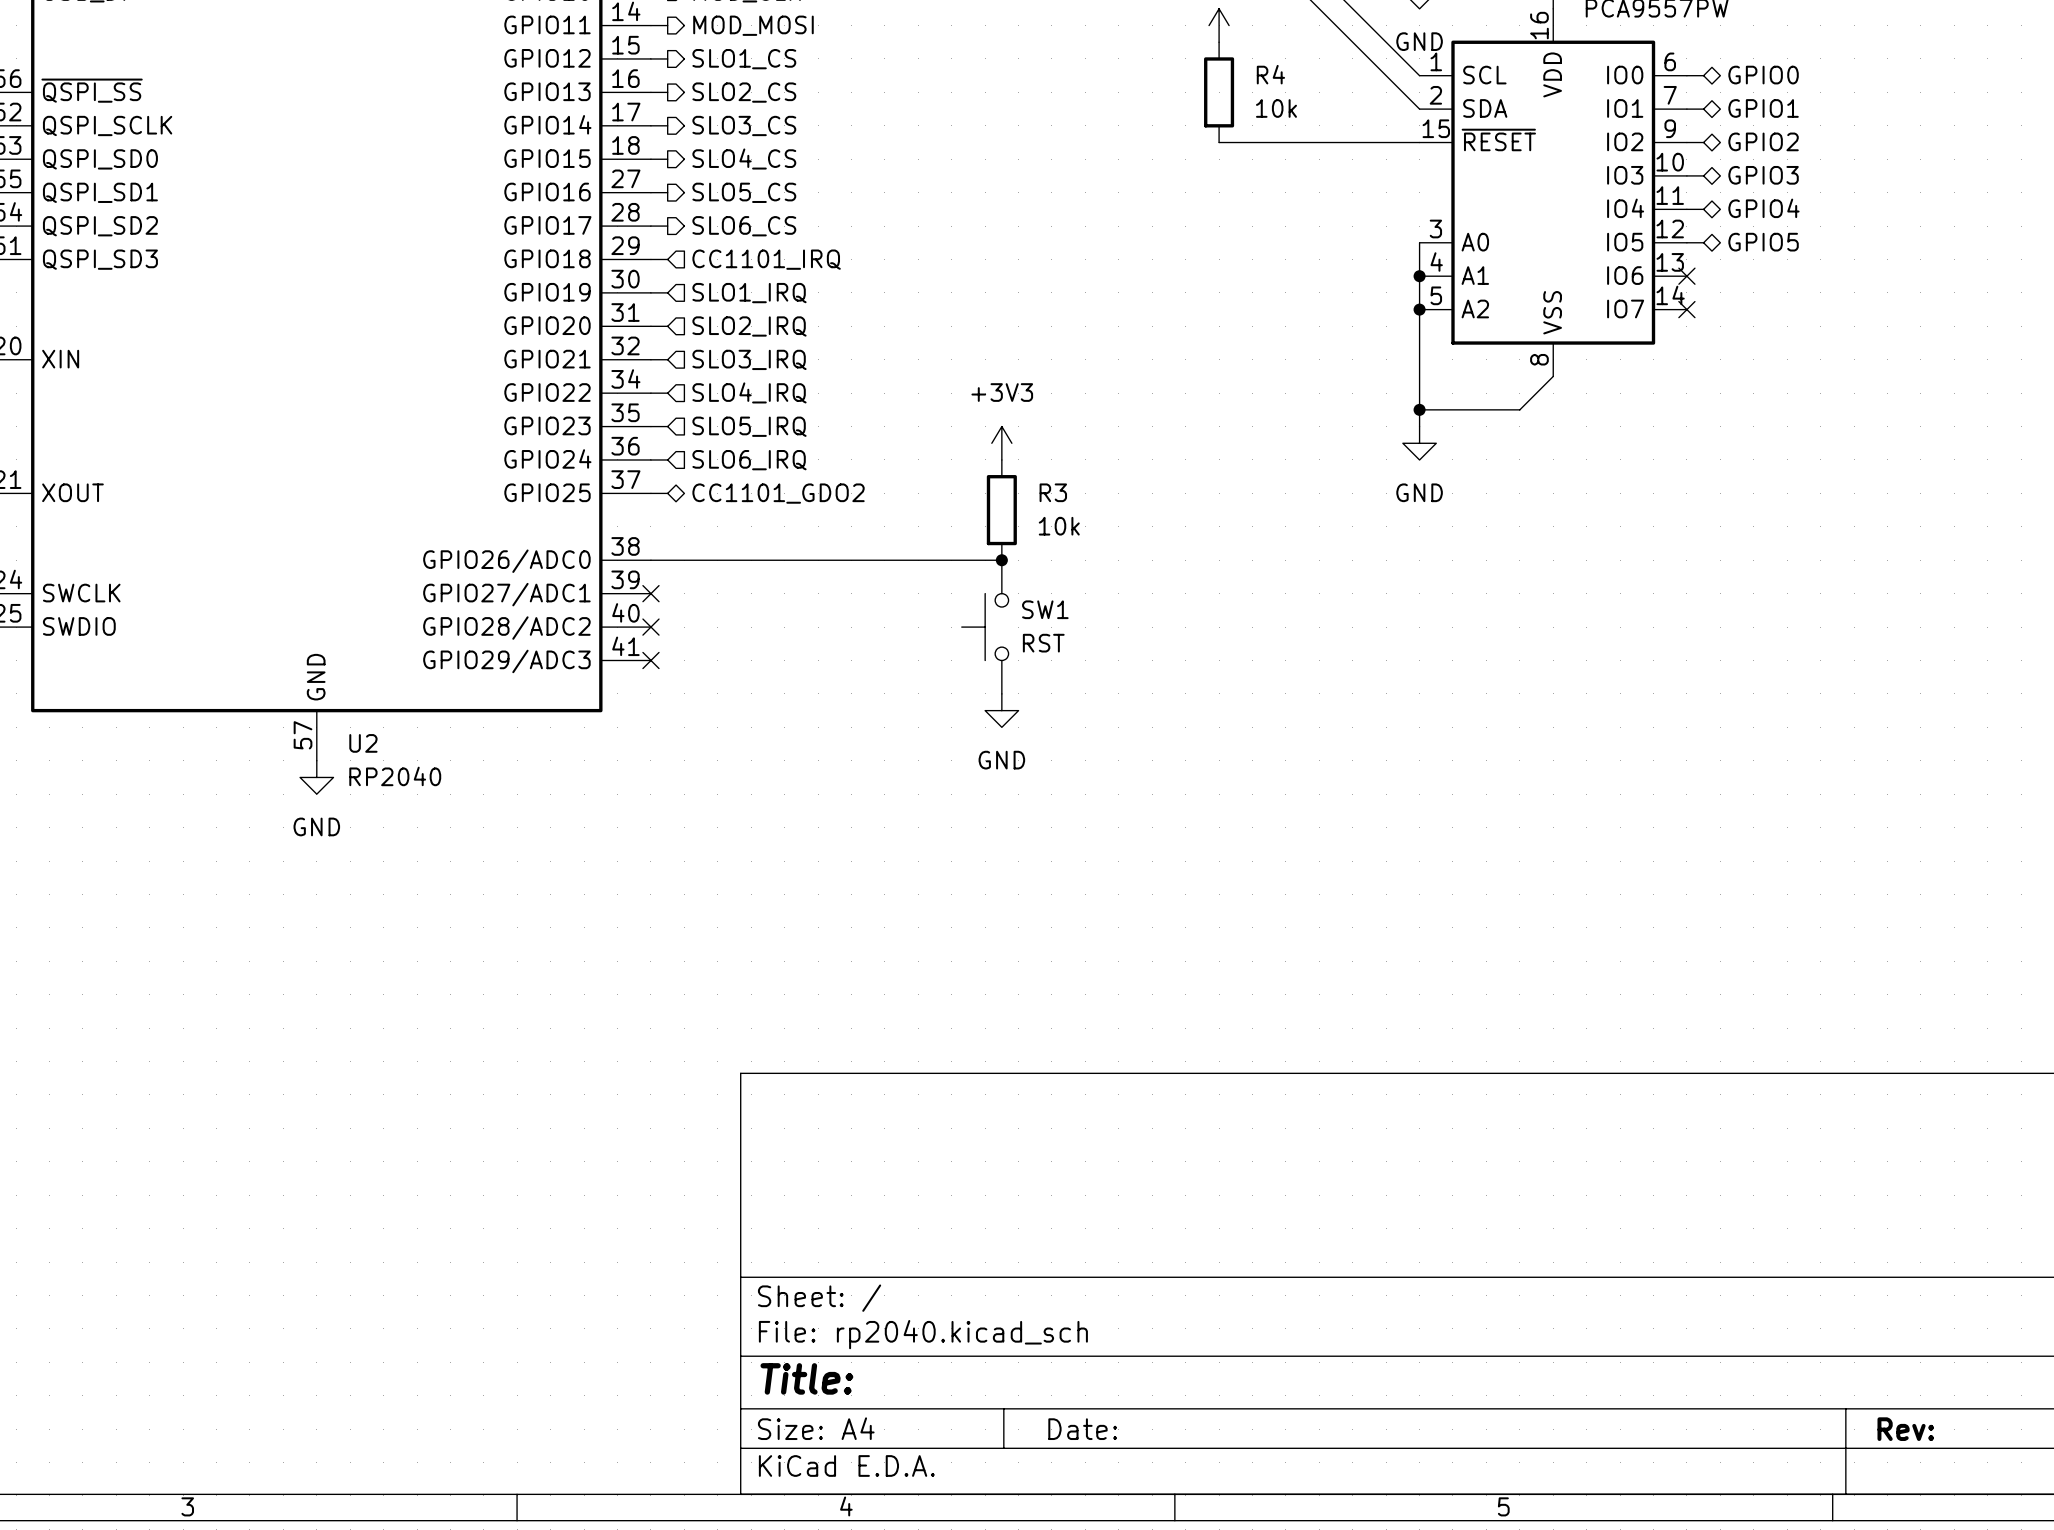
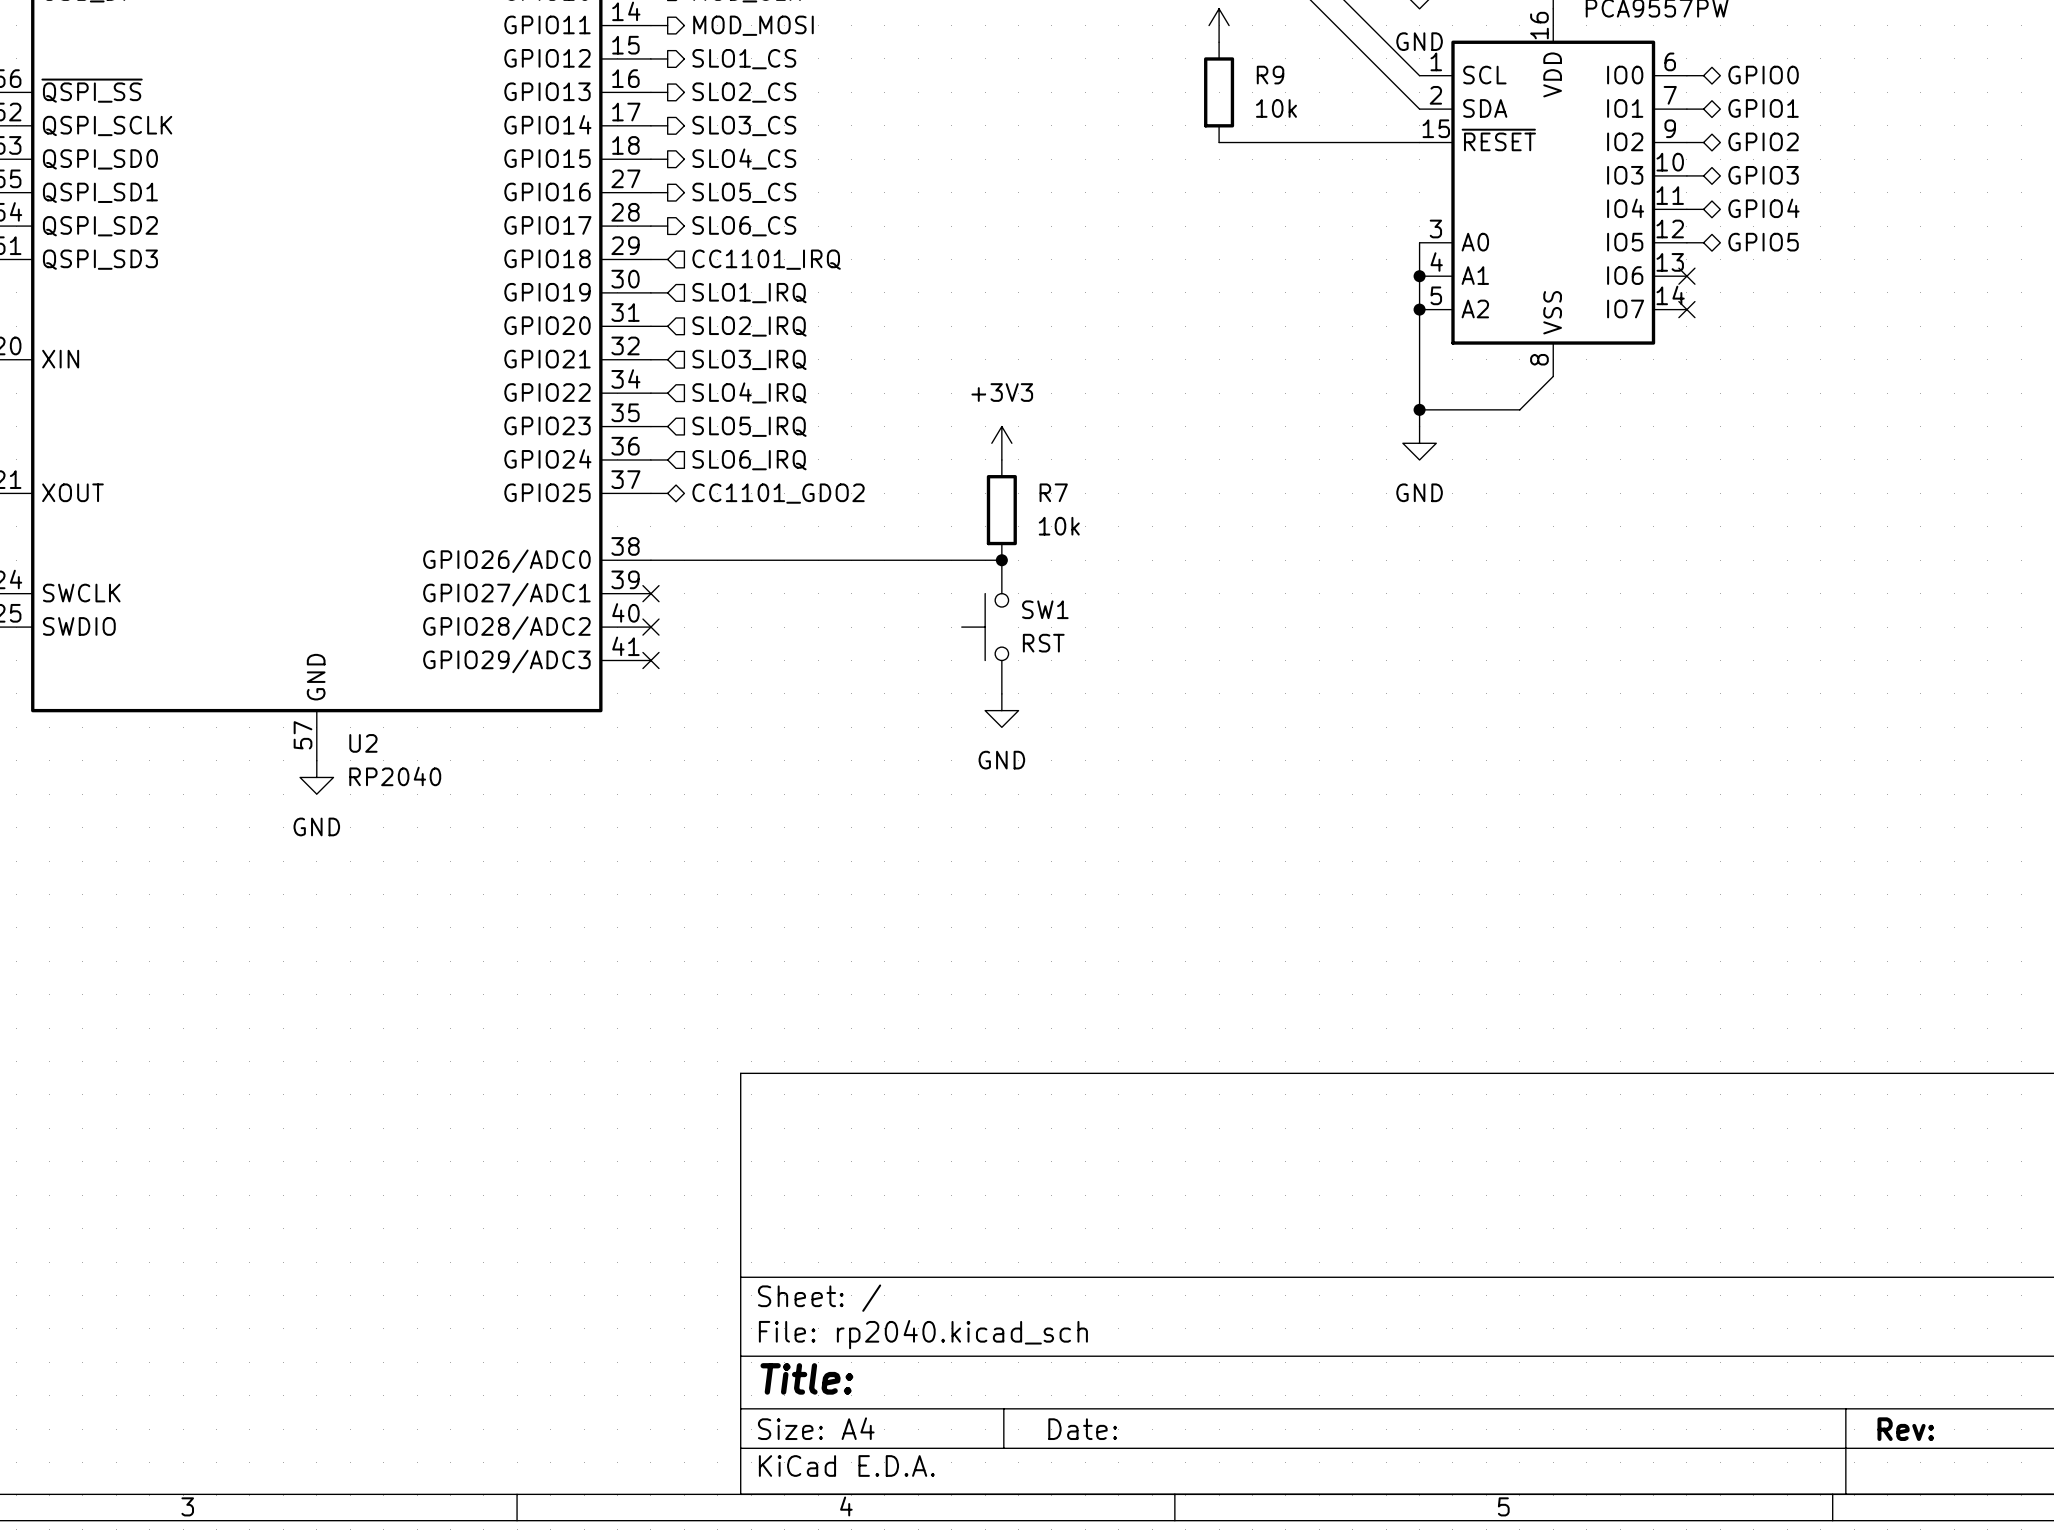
R4 name: R4 (1270, 74) -> R9 (1270, 75)
R3 name: R3 (1053, 492) -> R7 (1053, 492)

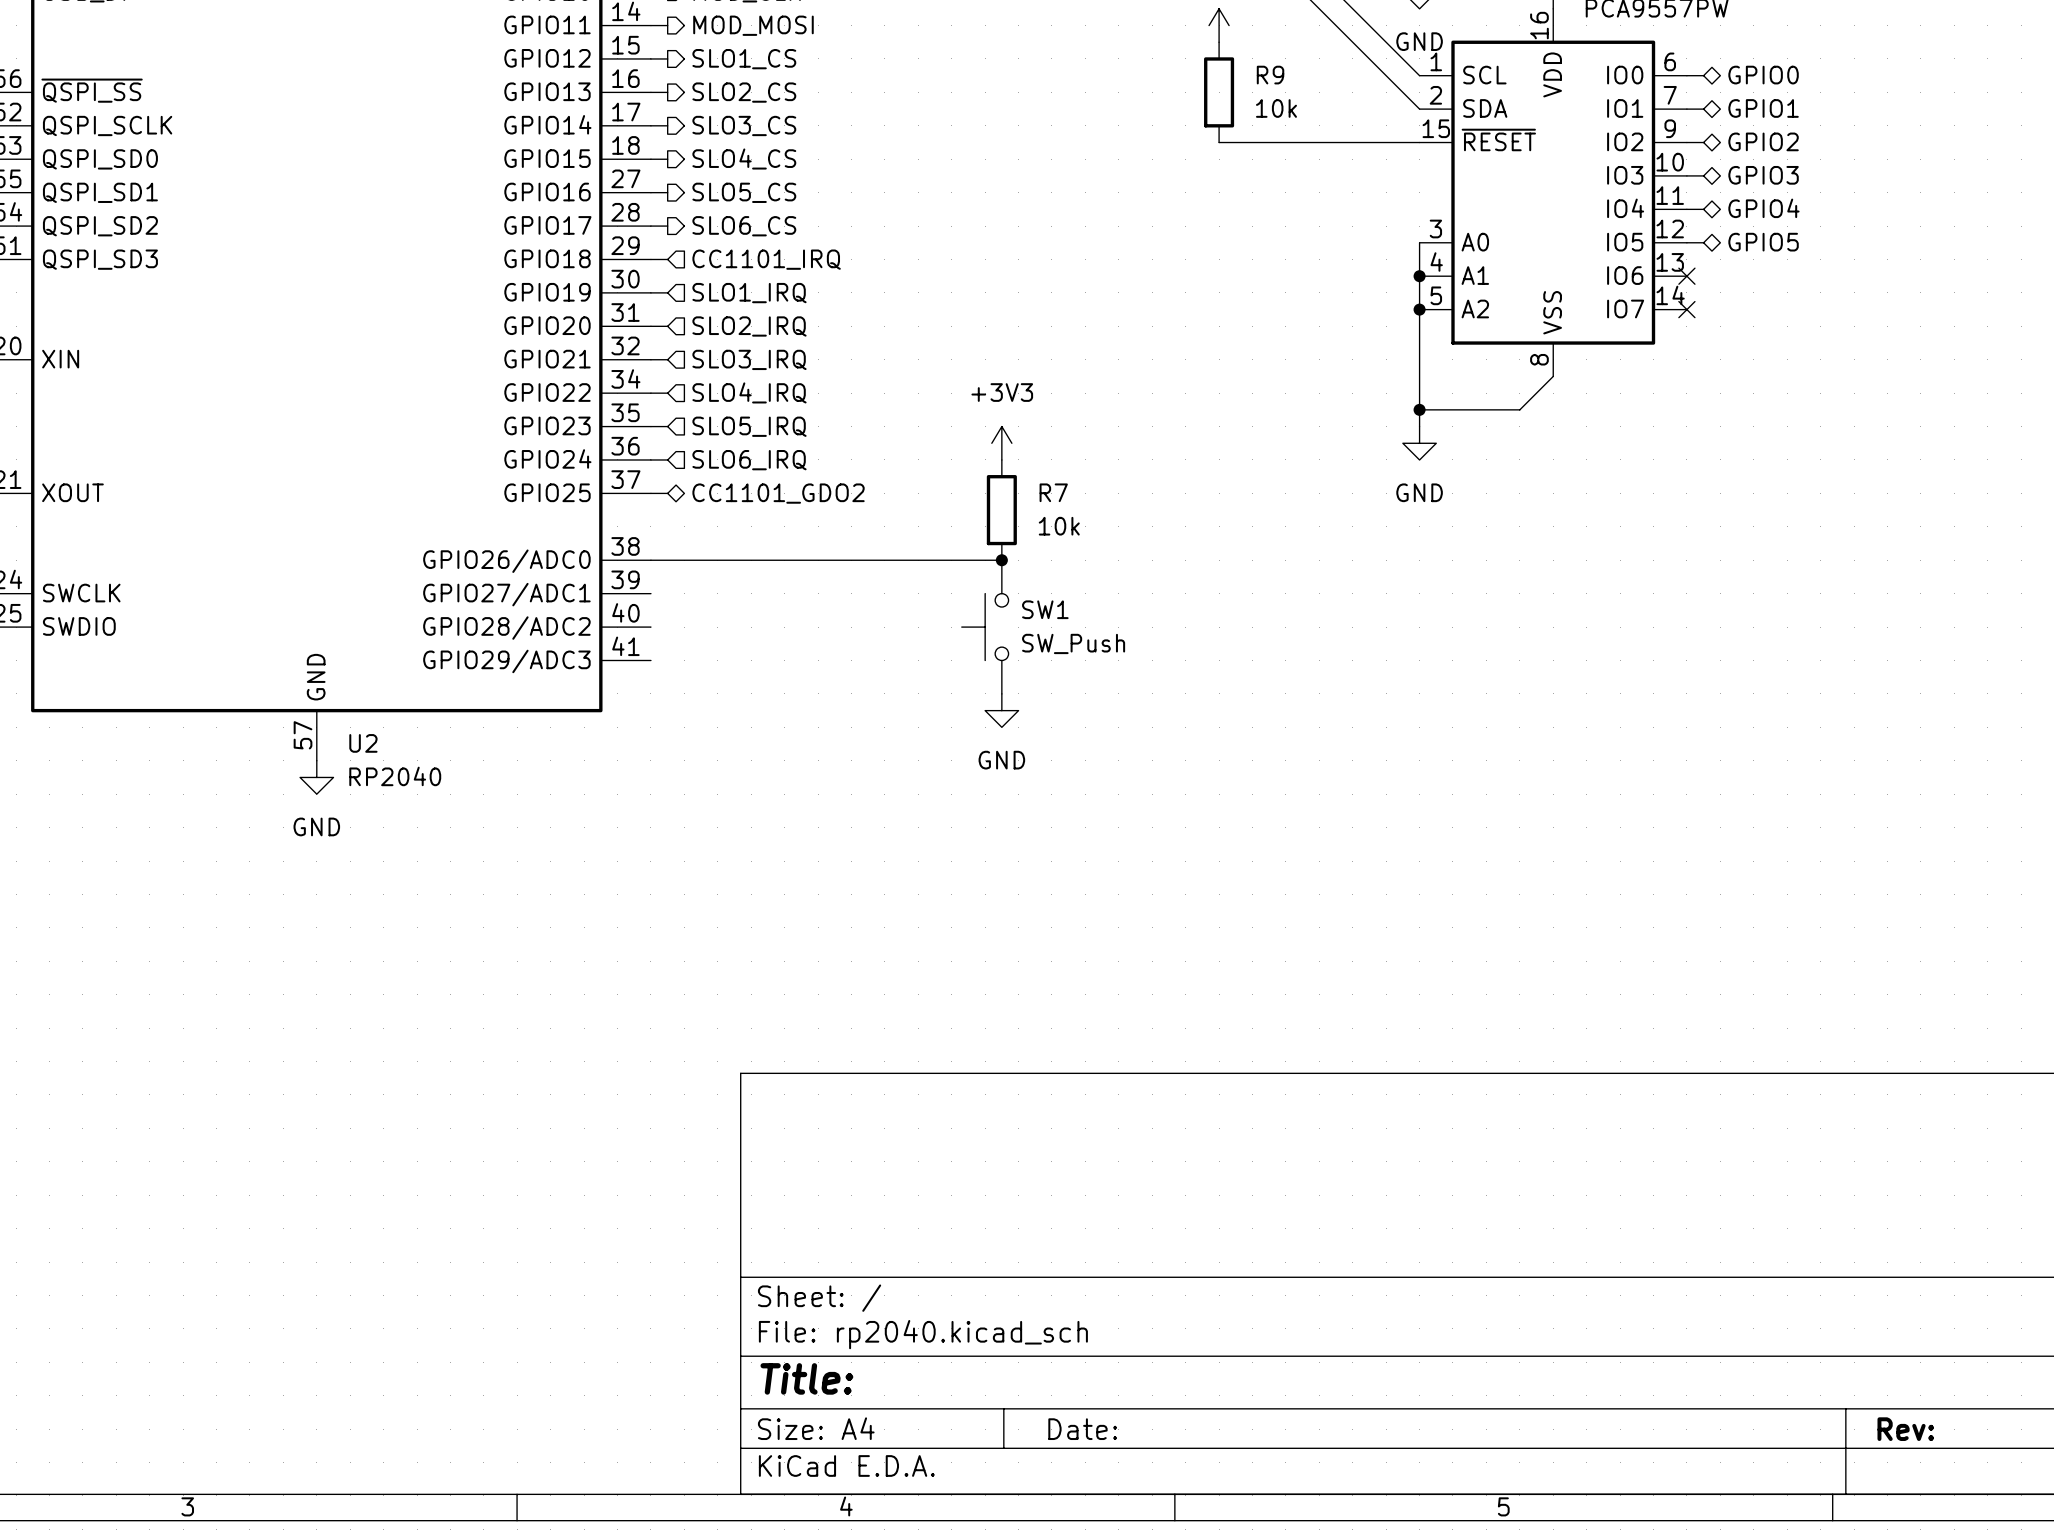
no-connect mark: (650, 593) -> none
no-connect mark: (650, 627) -> none
SW1 value: RST (1043, 643) -> SW_Push (1073, 643)
no-connect mark: (650, 660) -> none

